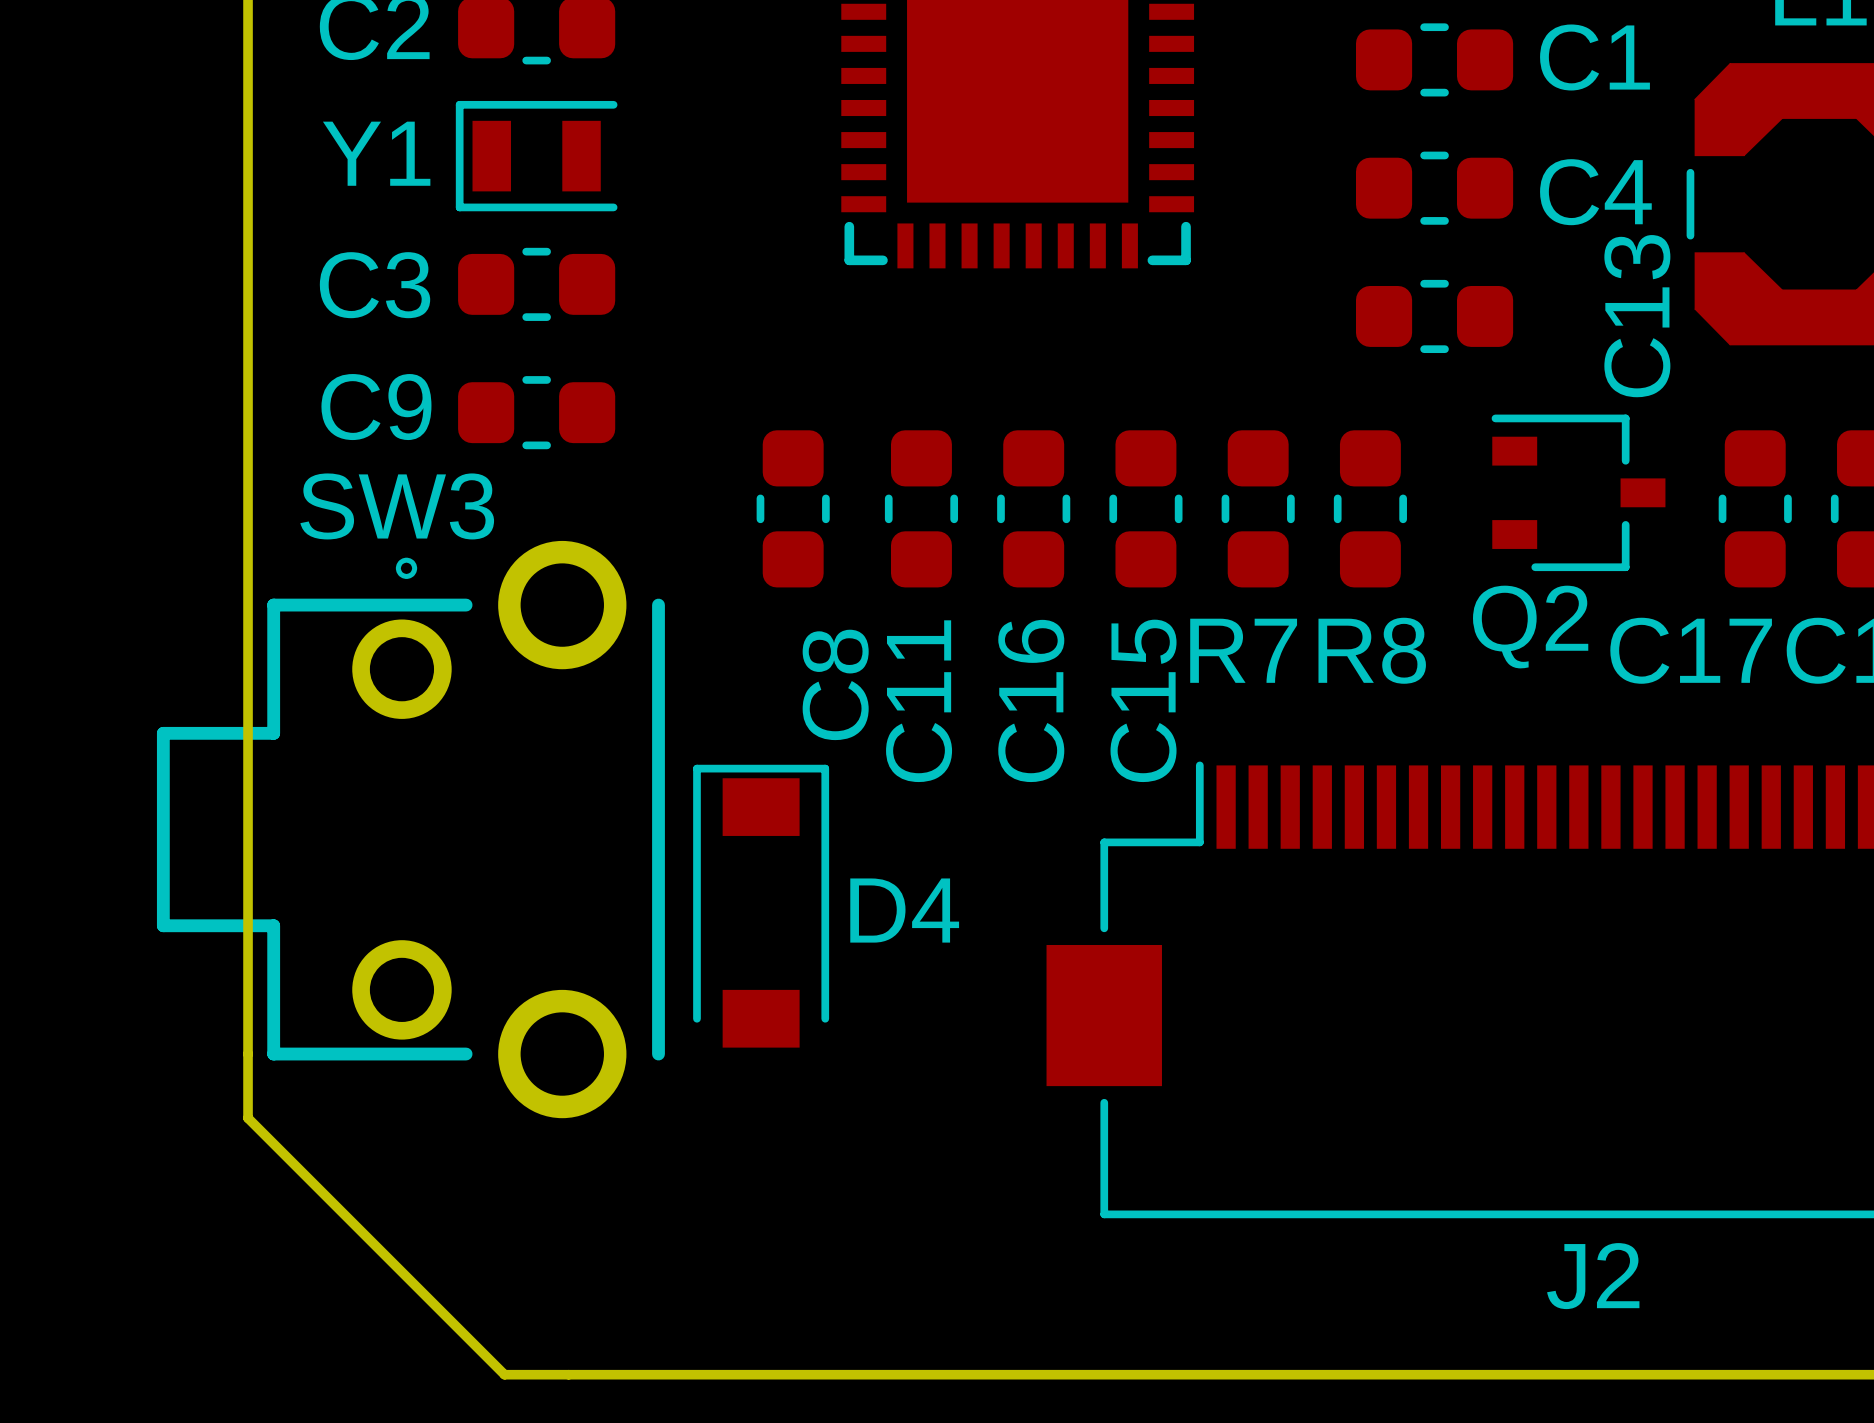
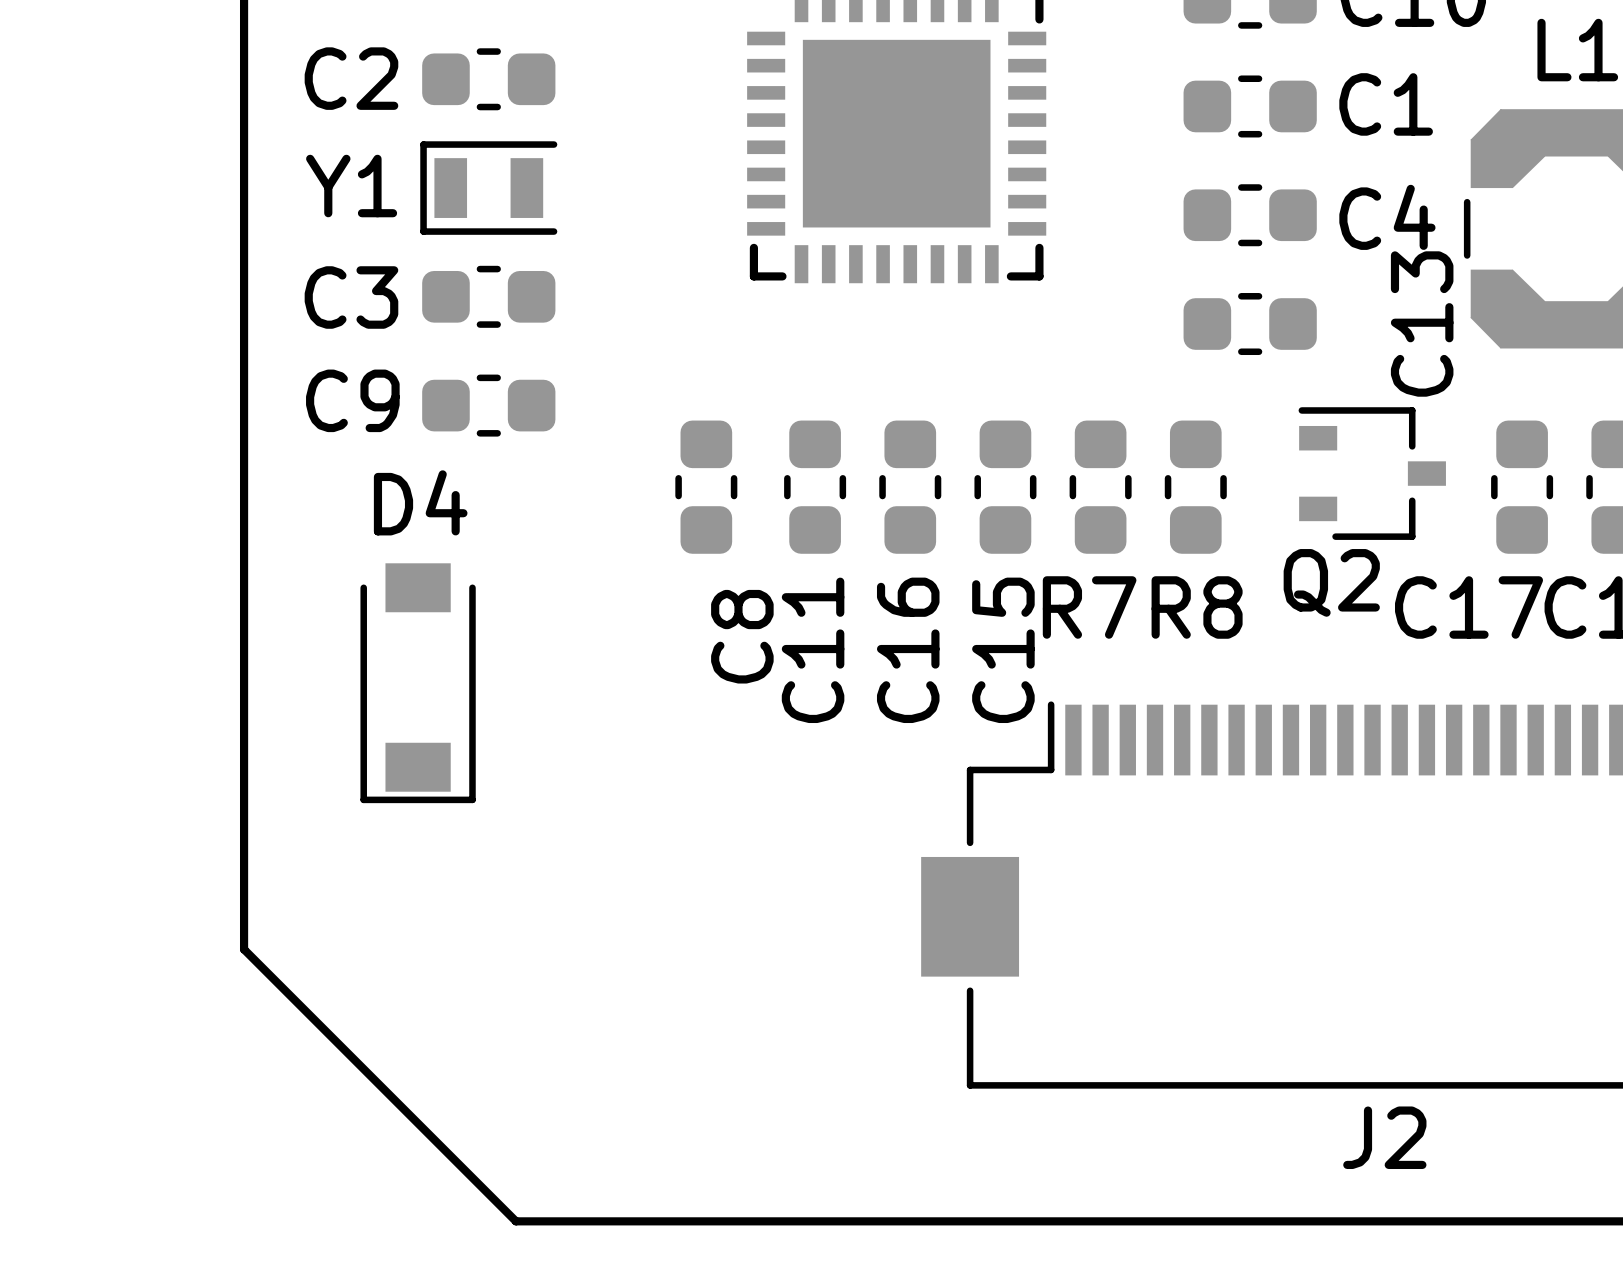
SW3: (410, 829) -> none
D4 rotation: 0° (761, 906) -> 180° (418, 683)
D4 position: (761, 906) -> (418, 683)
D4 name position: D4 (904, 910) -> D4 (420, 502)
board edge: (248, 1054) (248, 1118) (504, 1374) (568, 1374) -> (244, 949) (515, 1221)

